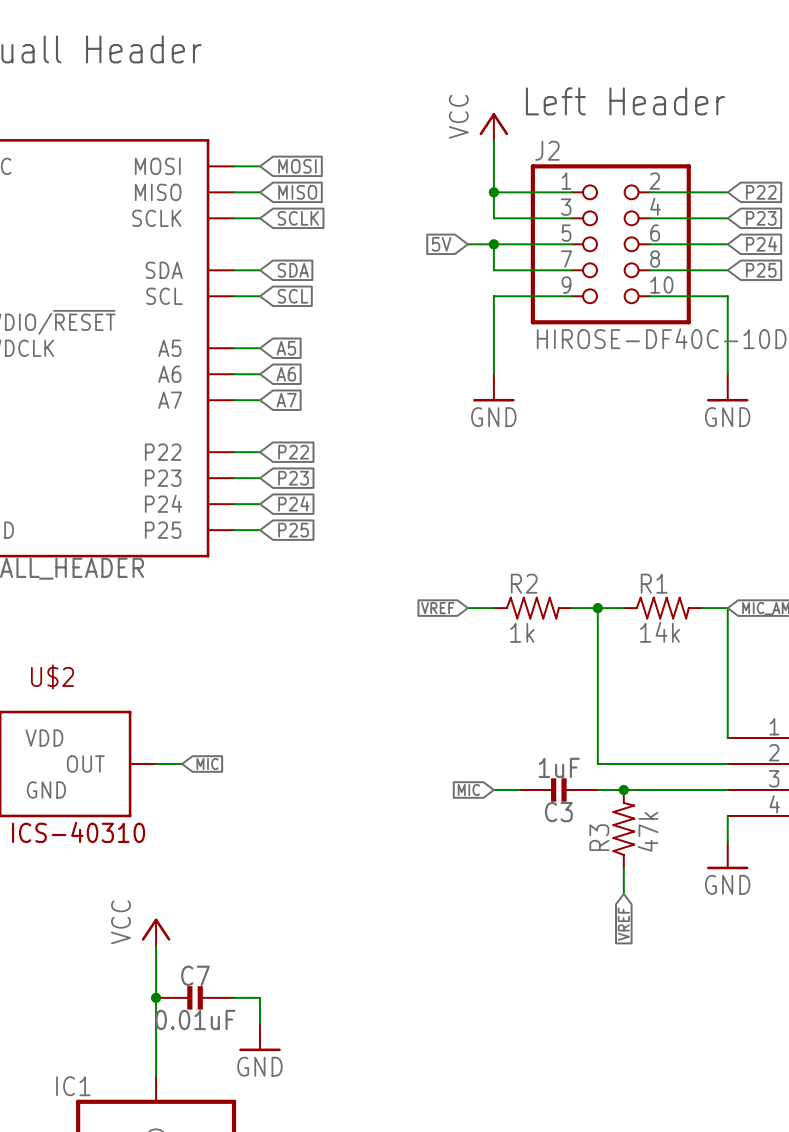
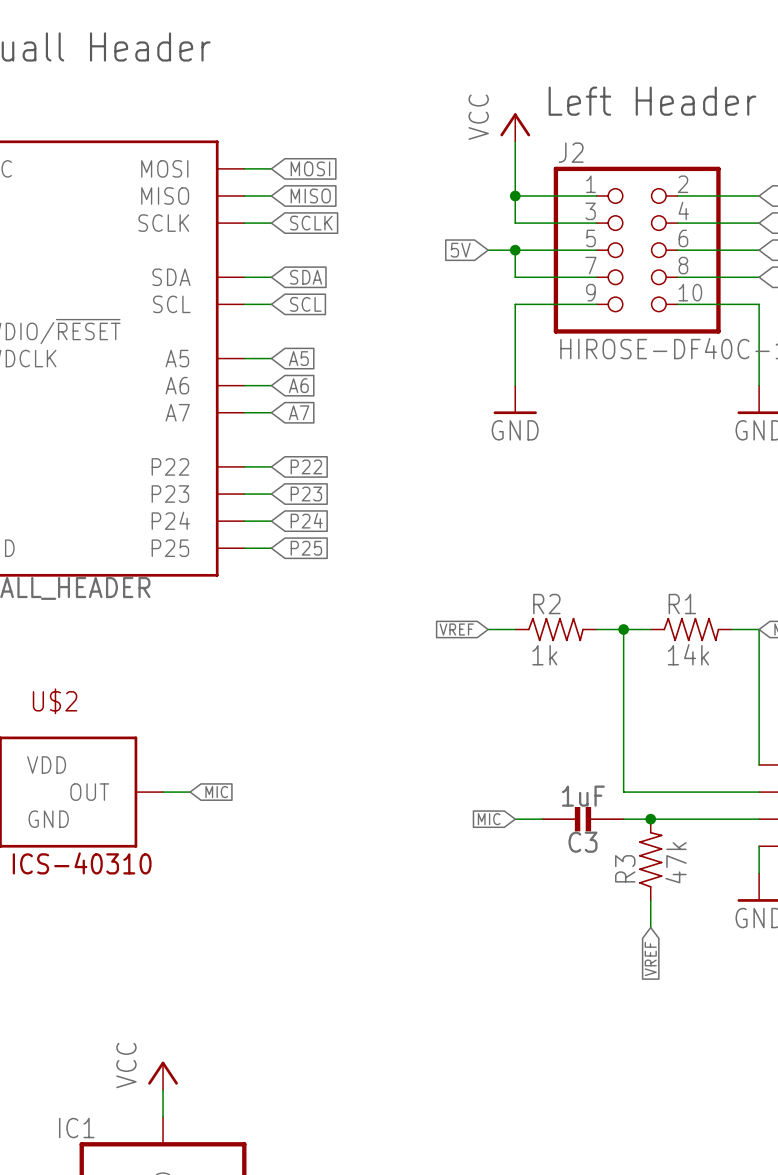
power symbol position: VCC (156, 932) -> VCC (163, 1075)
wire: (156, 945) (156, 1049) -> none
junction: (156, 997) -> none
C7: 0.01uF (195, 997) -> none
wire: (234, 997) (260, 997) (260, 1023) -> none
power symbol: GND (260, 1037) -> none

